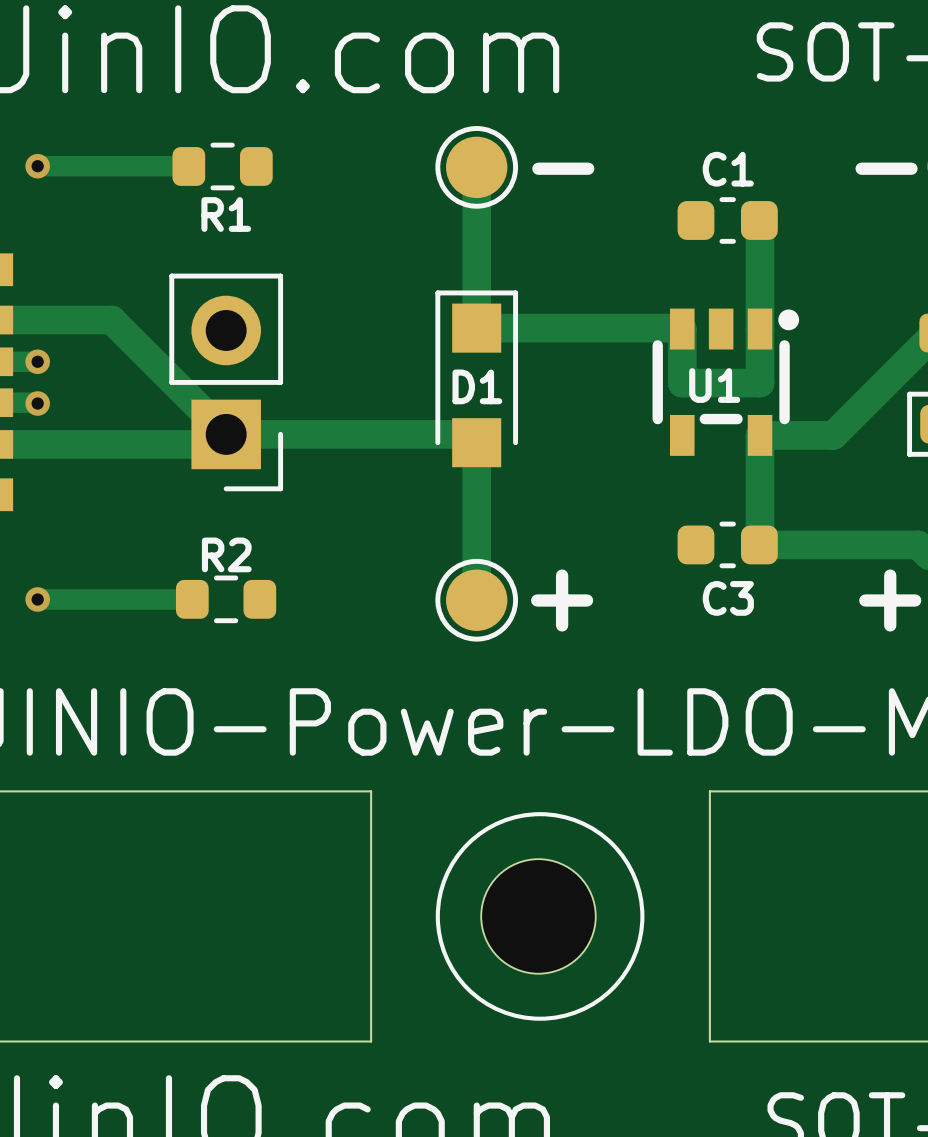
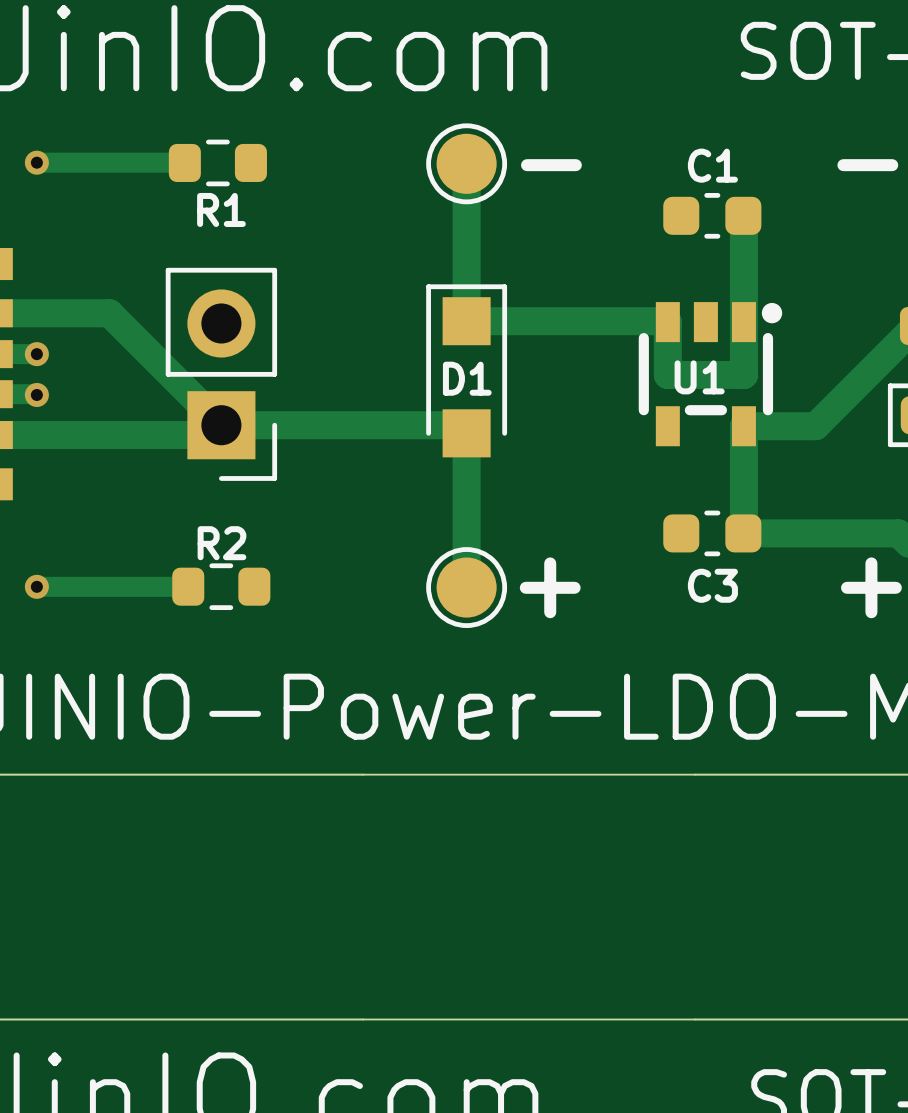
board edge: (371, 791) (371, 1041) -> (363, 774) (694, 774)
board edge: (709, 791) (709, 1041) -> (363, 1019) (694, 1019)
part: (540, 916) -> none

